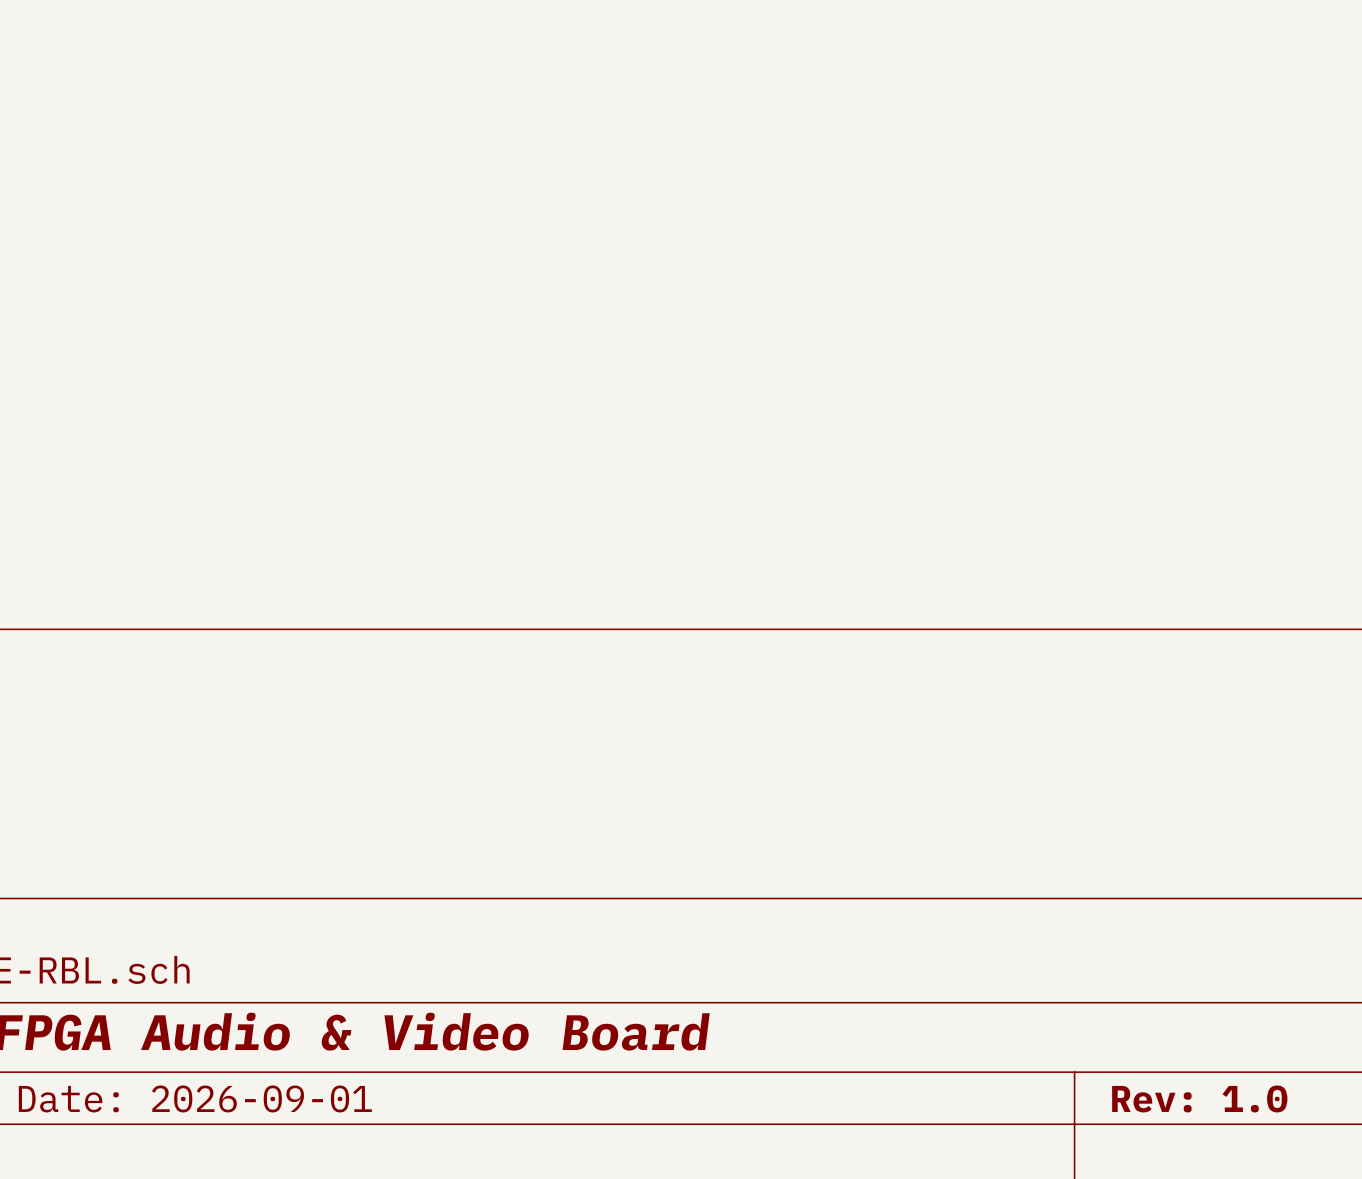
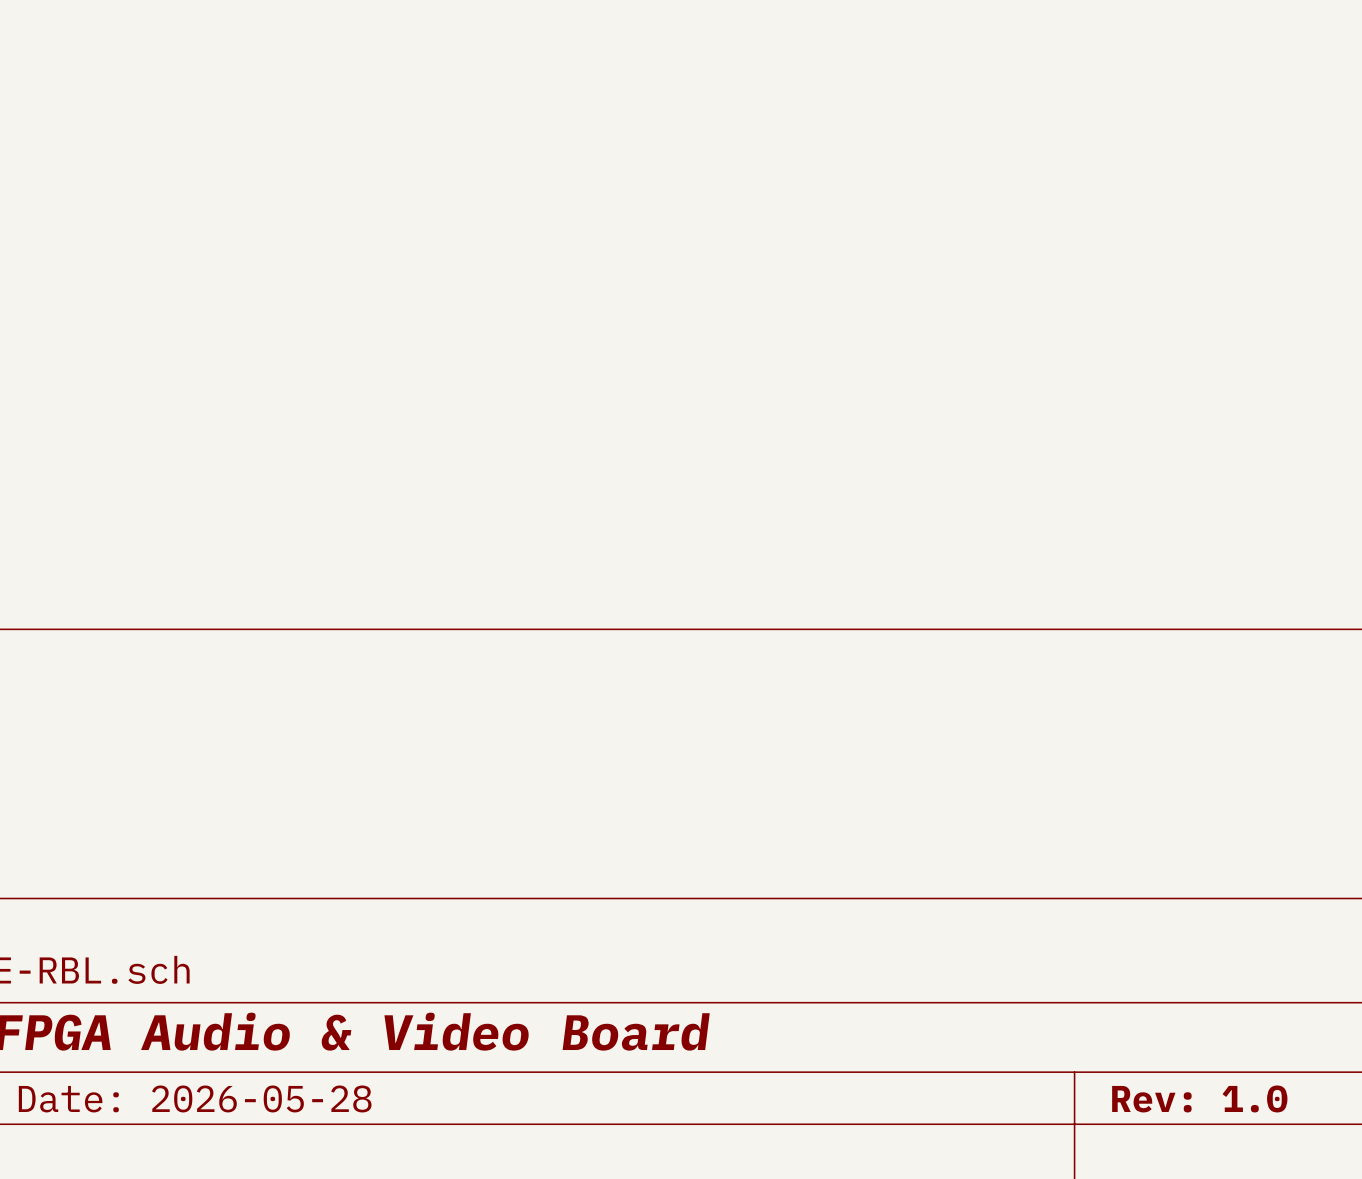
title block: Date: 2026-09-01 (195, 1098) -> Date: 2026-05-28 (195, 1098)

